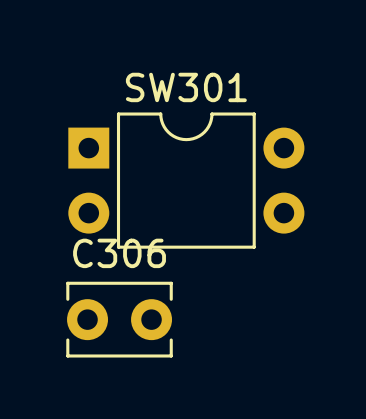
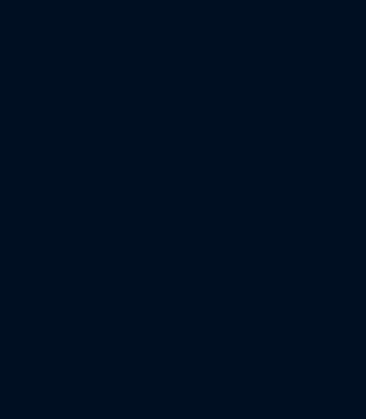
SW301: (186, 180) -> none
C306: (119, 319) -> none

